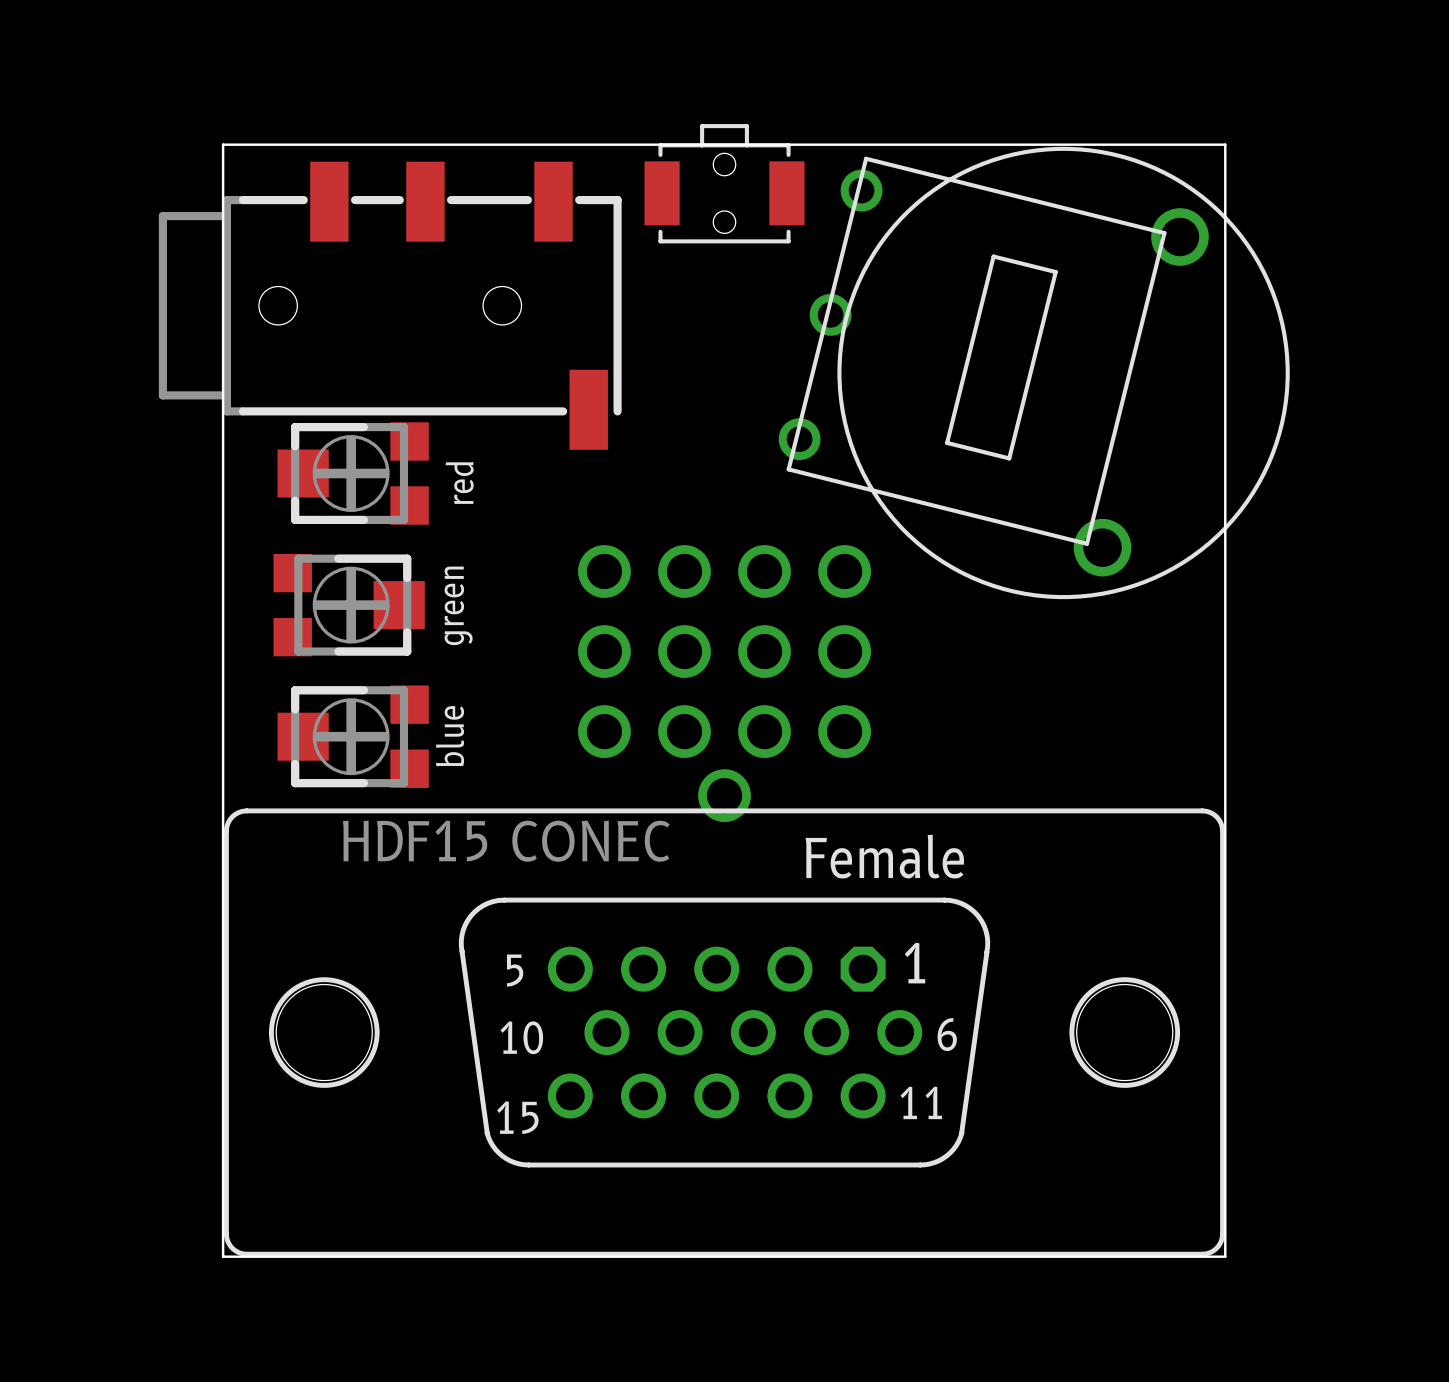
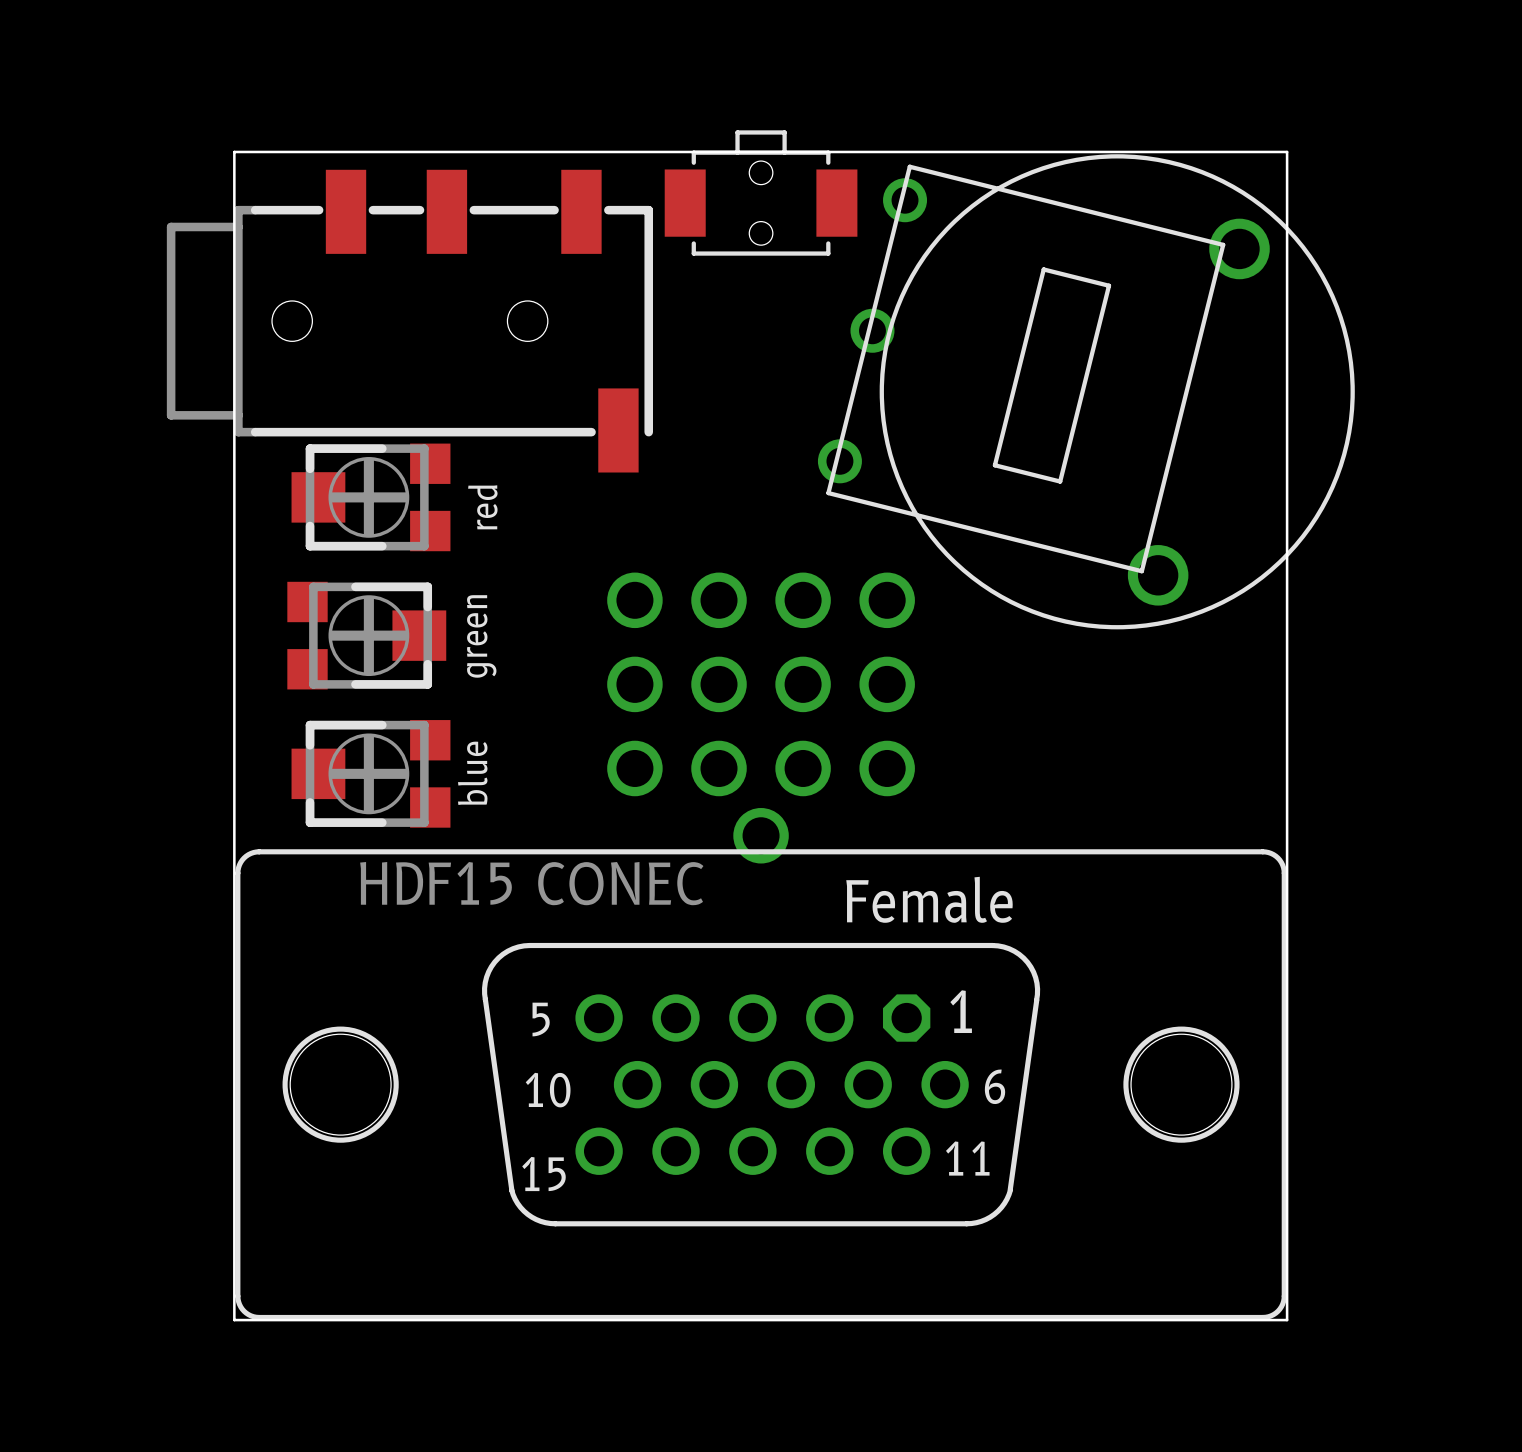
part footprint: [644, 124, 805, 244] -> [664, 130, 858, 256]

